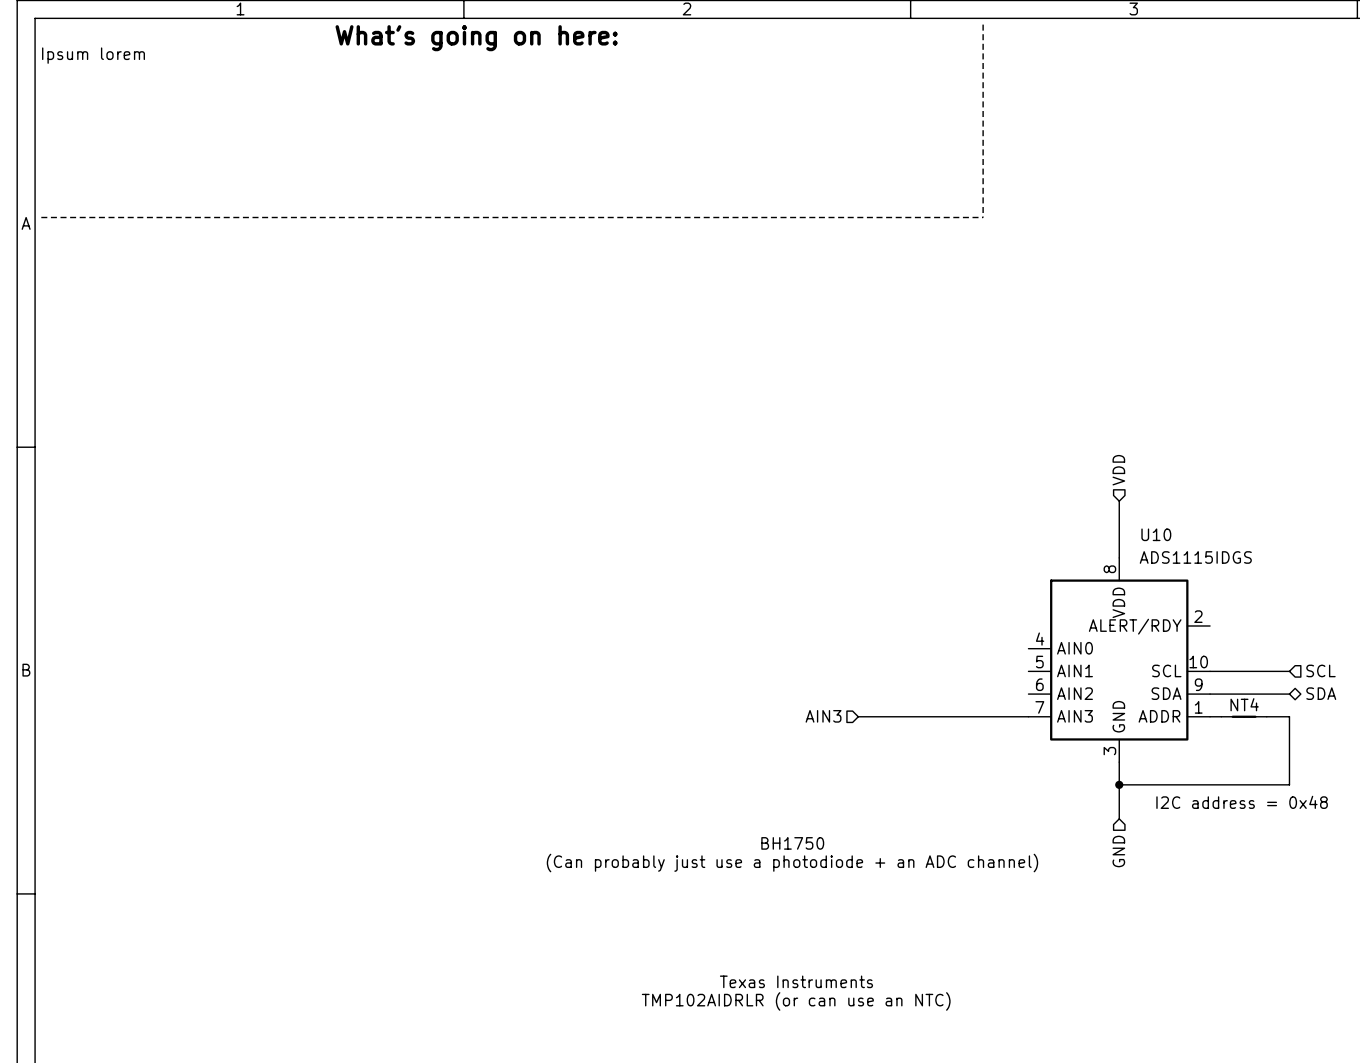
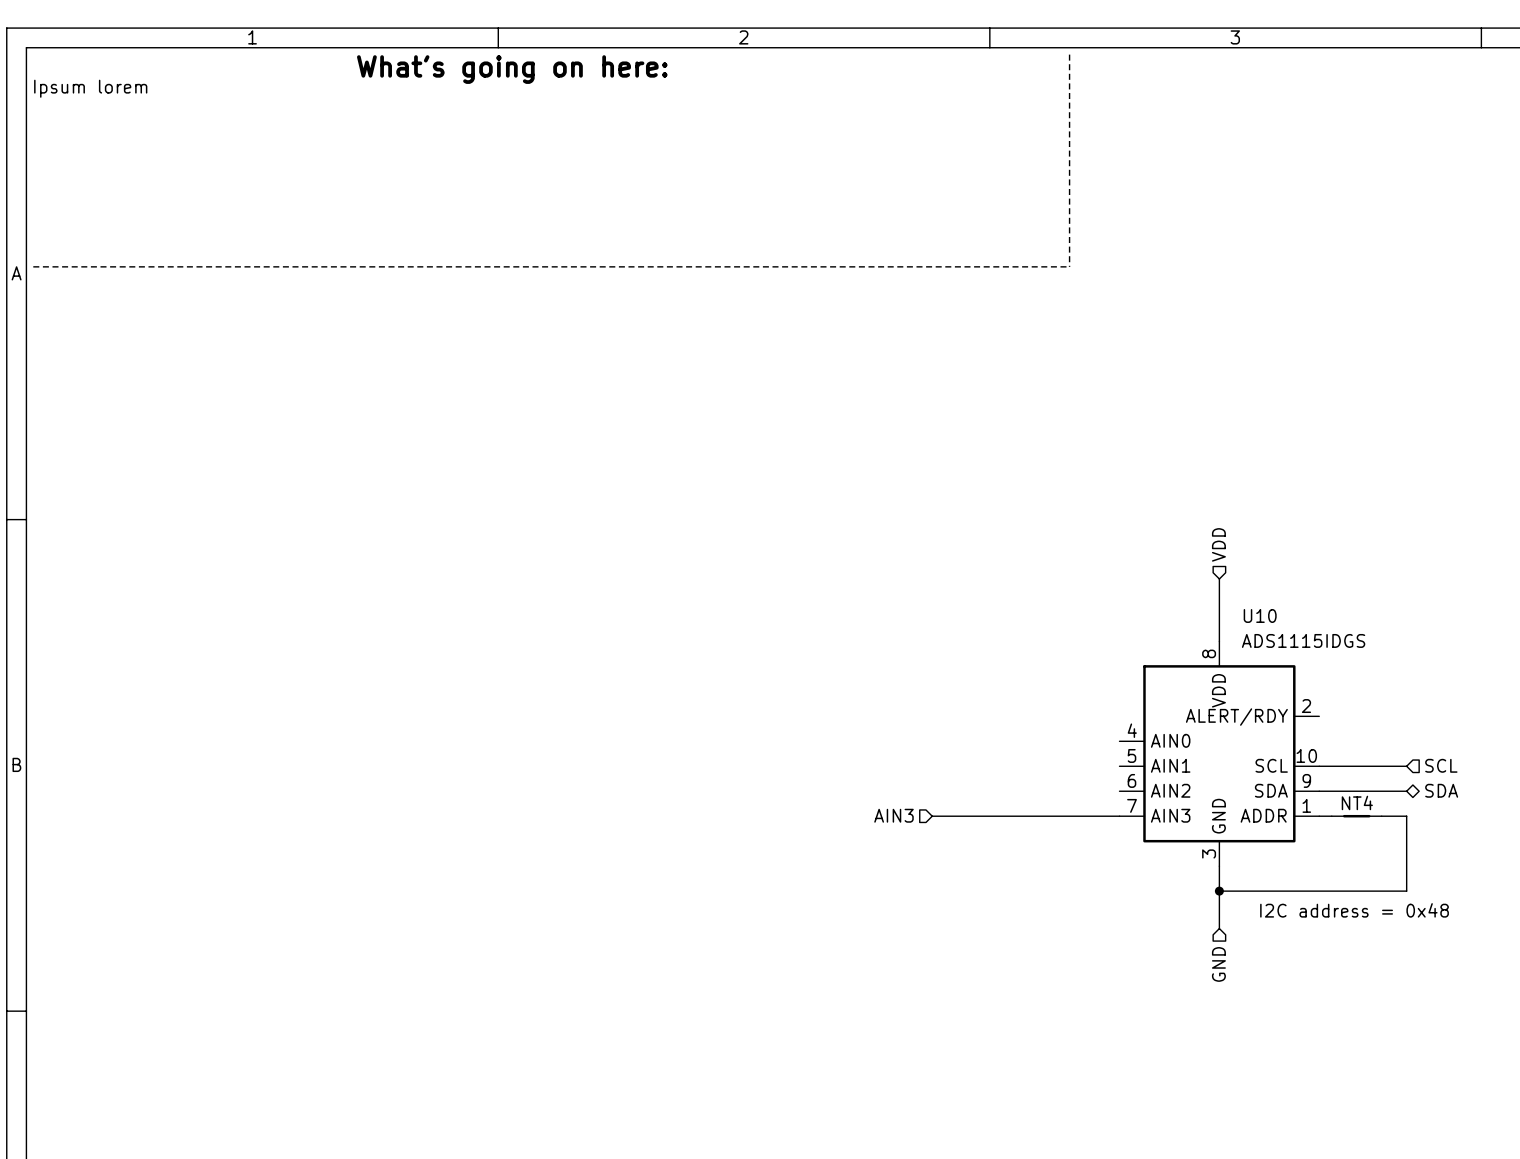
text: BH1750 (792, 843) -> none
text: (Can probably just use a photodiode + an ADC channel) (792, 863) -> none
text: Texas Instruments (796, 981) -> none
text: TMP102AIDRLR (or can use an NTC) (796, 1001) -> none

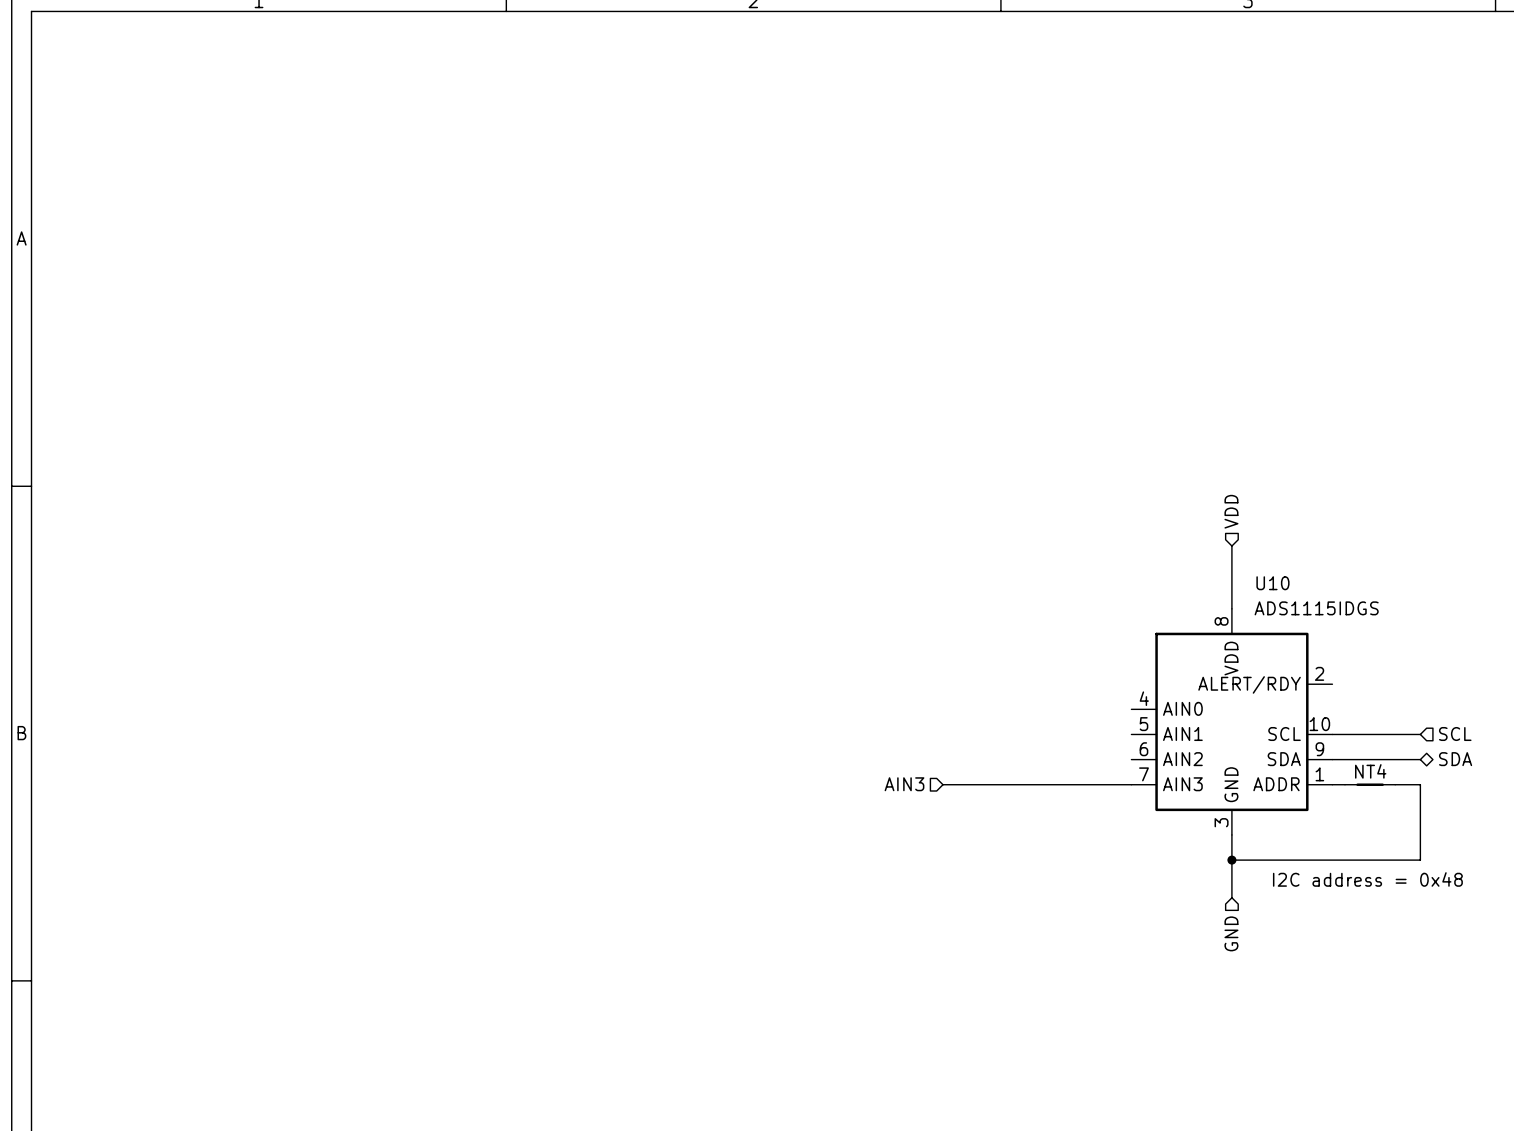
line: (1069, 54) (1069, 266) (33, 266) -> none
text: What's going on here: (512, 69) -> none
text: Ipsum lorem (90, 88) -> none

